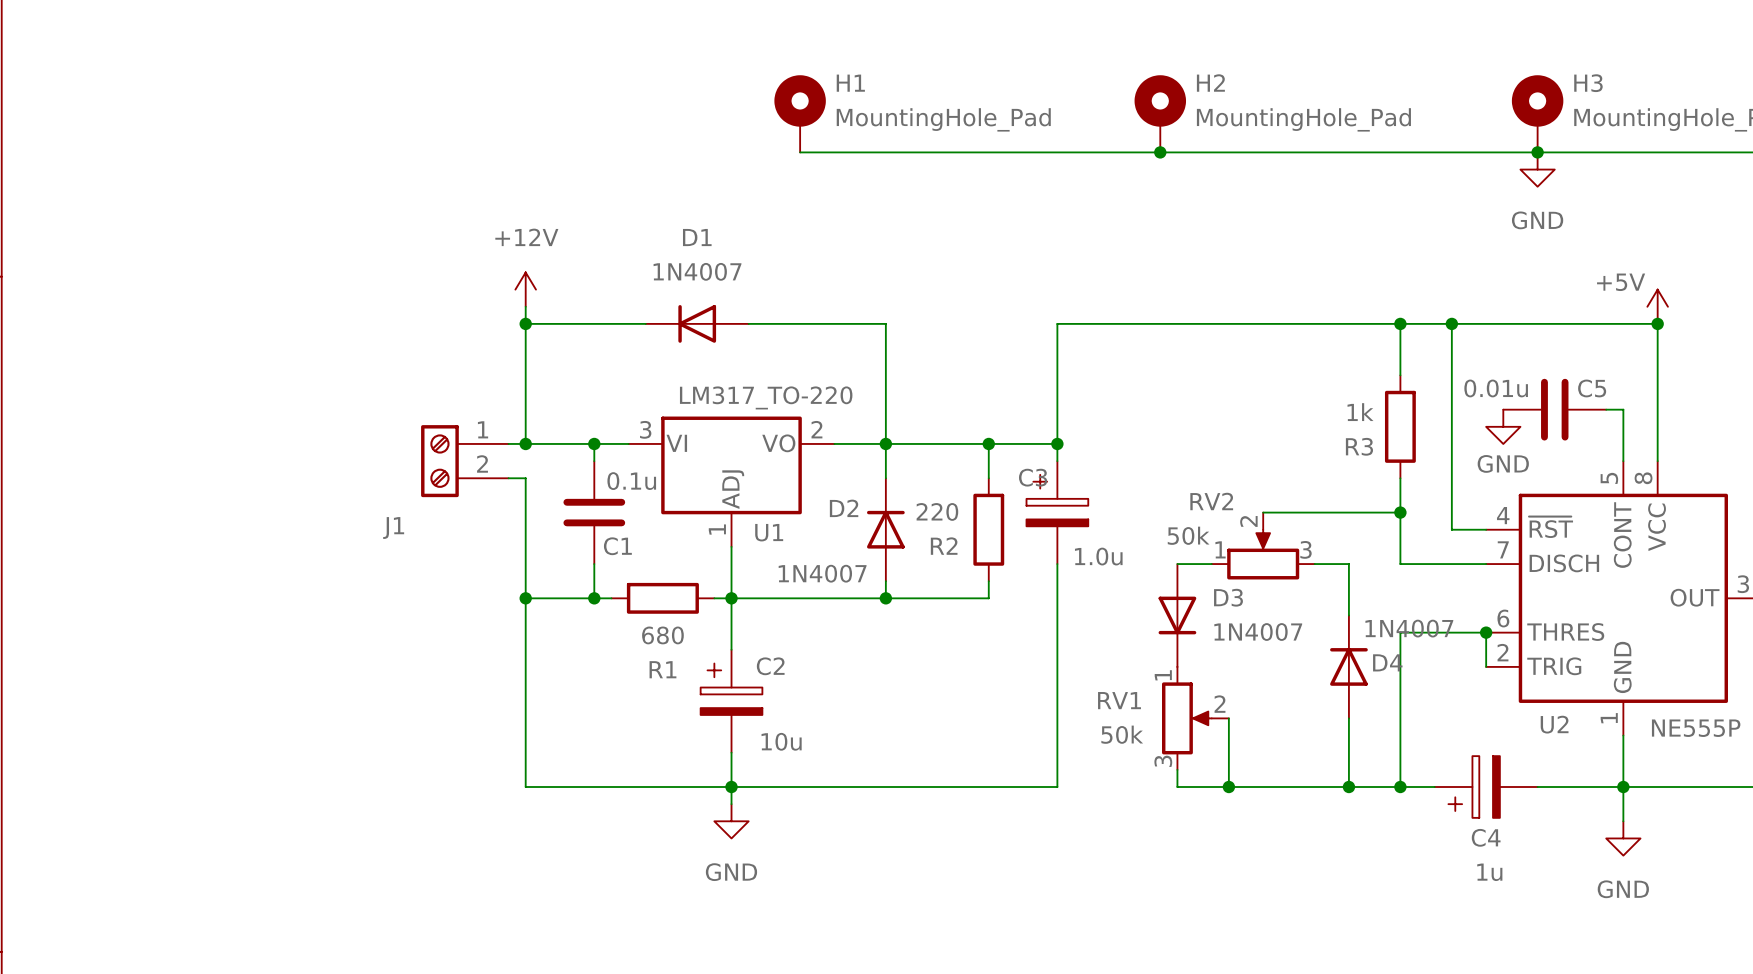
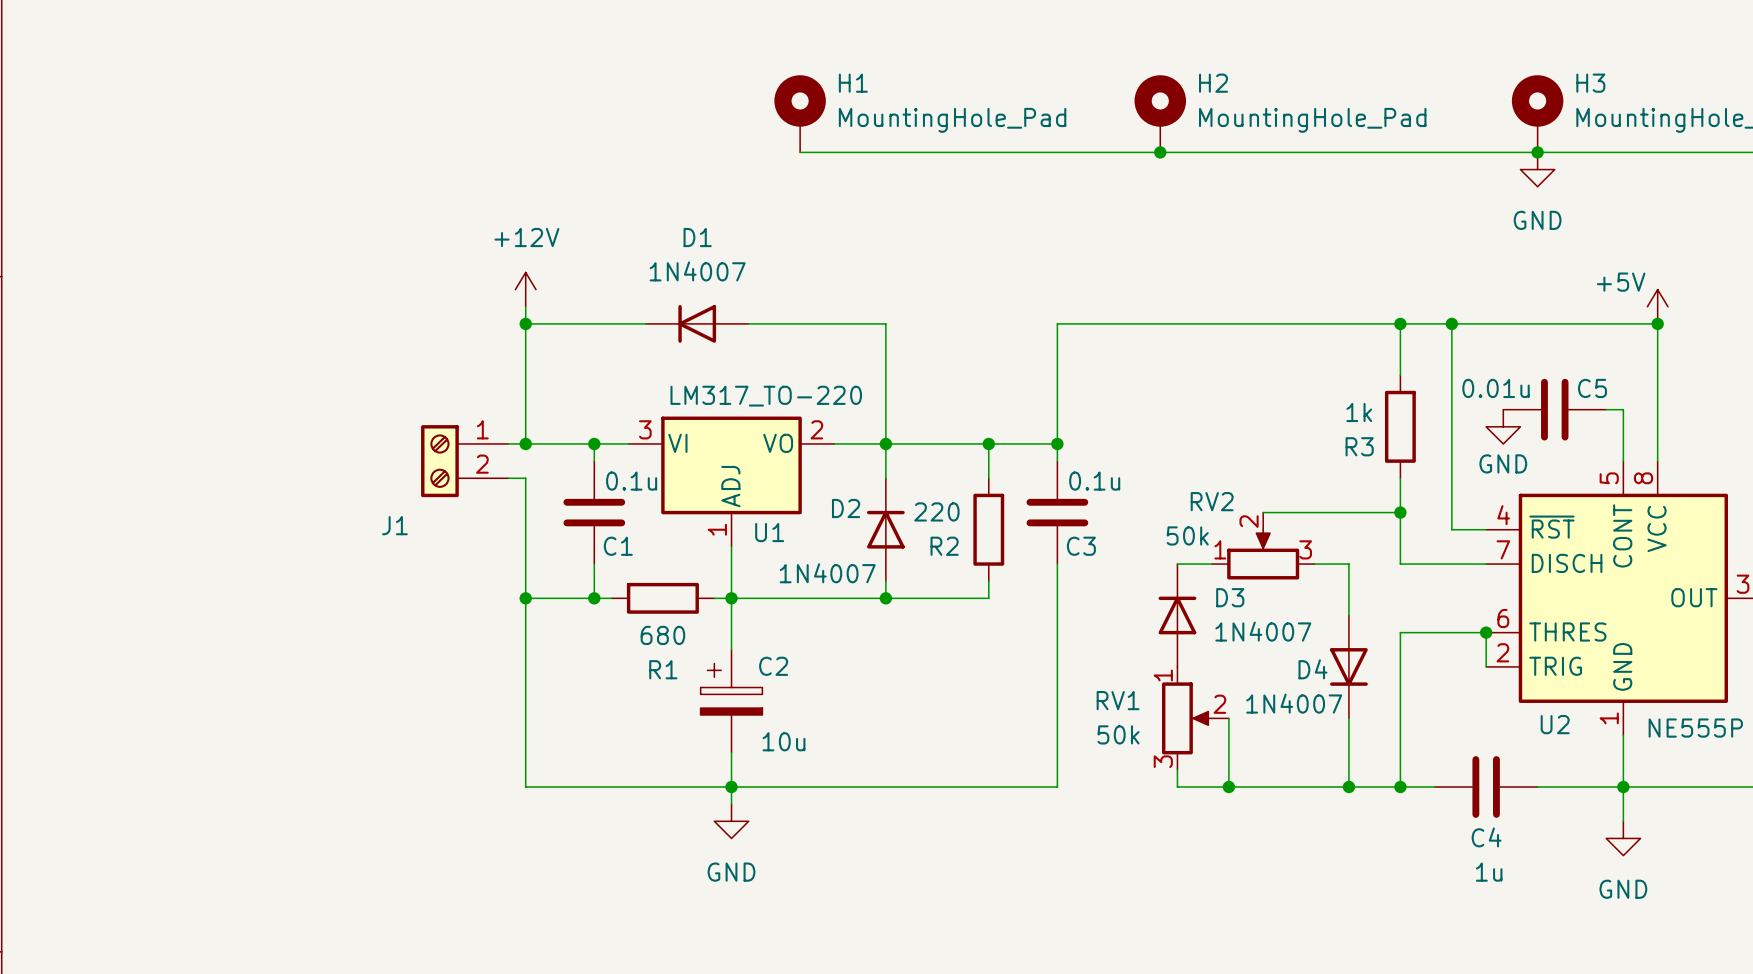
C3 symbol: [1026, 461, 1089, 565] -> [1026, 461, 1089, 565]
C3 name position: C3 (1033, 477) -> C3 (1081, 546)
C3 value: 1.0u (1098, 556) -> 0.1u (1094, 481)
D3 rotation: 0° (1177, 615) -> 180° (1177, 615)
D4 rotation: 0° (1348, 666) -> 180° (1348, 666)
C4 symbol: [1434, 756, 1538, 818] -> [1434, 756, 1538, 818]

